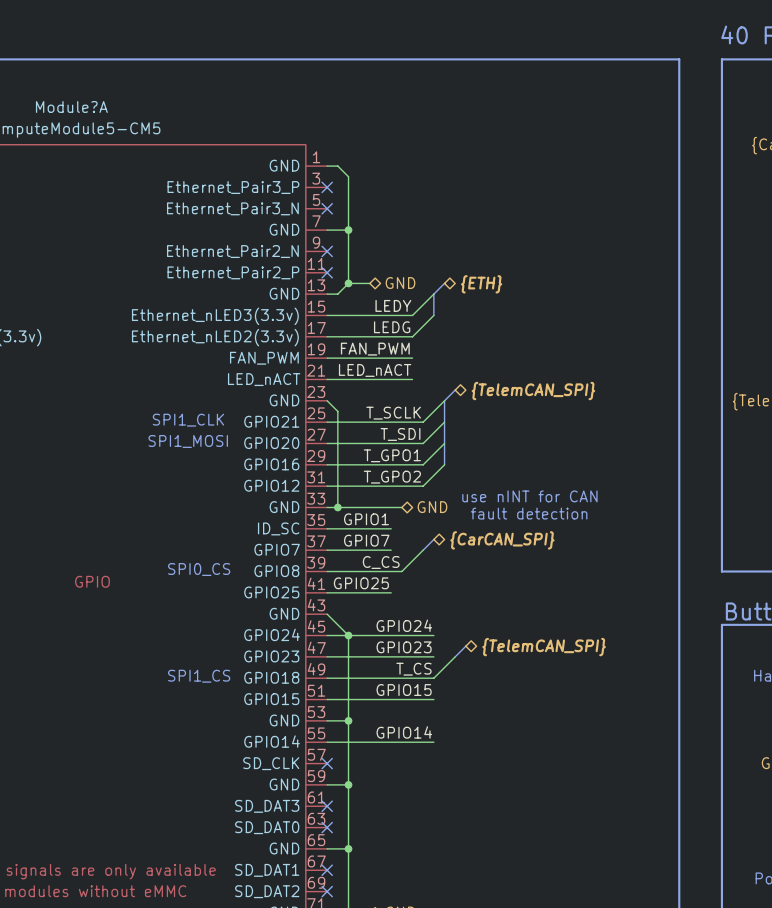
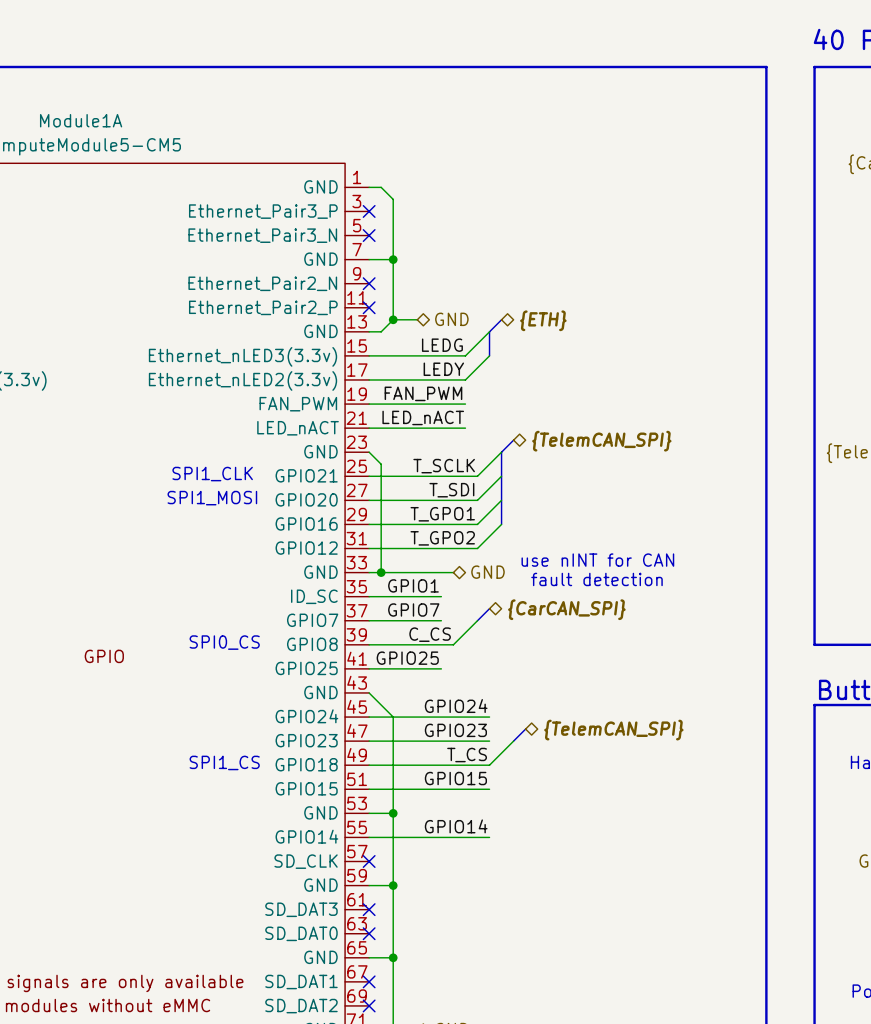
Module?A name: Module?A (71, 107) -> Module1A (81, 120)
label: LEDY (393, 305) -> LEDG (442, 345)
label: LEDG (392, 327) -> LEDY (443, 369)
junction: (348, 635) -> none

